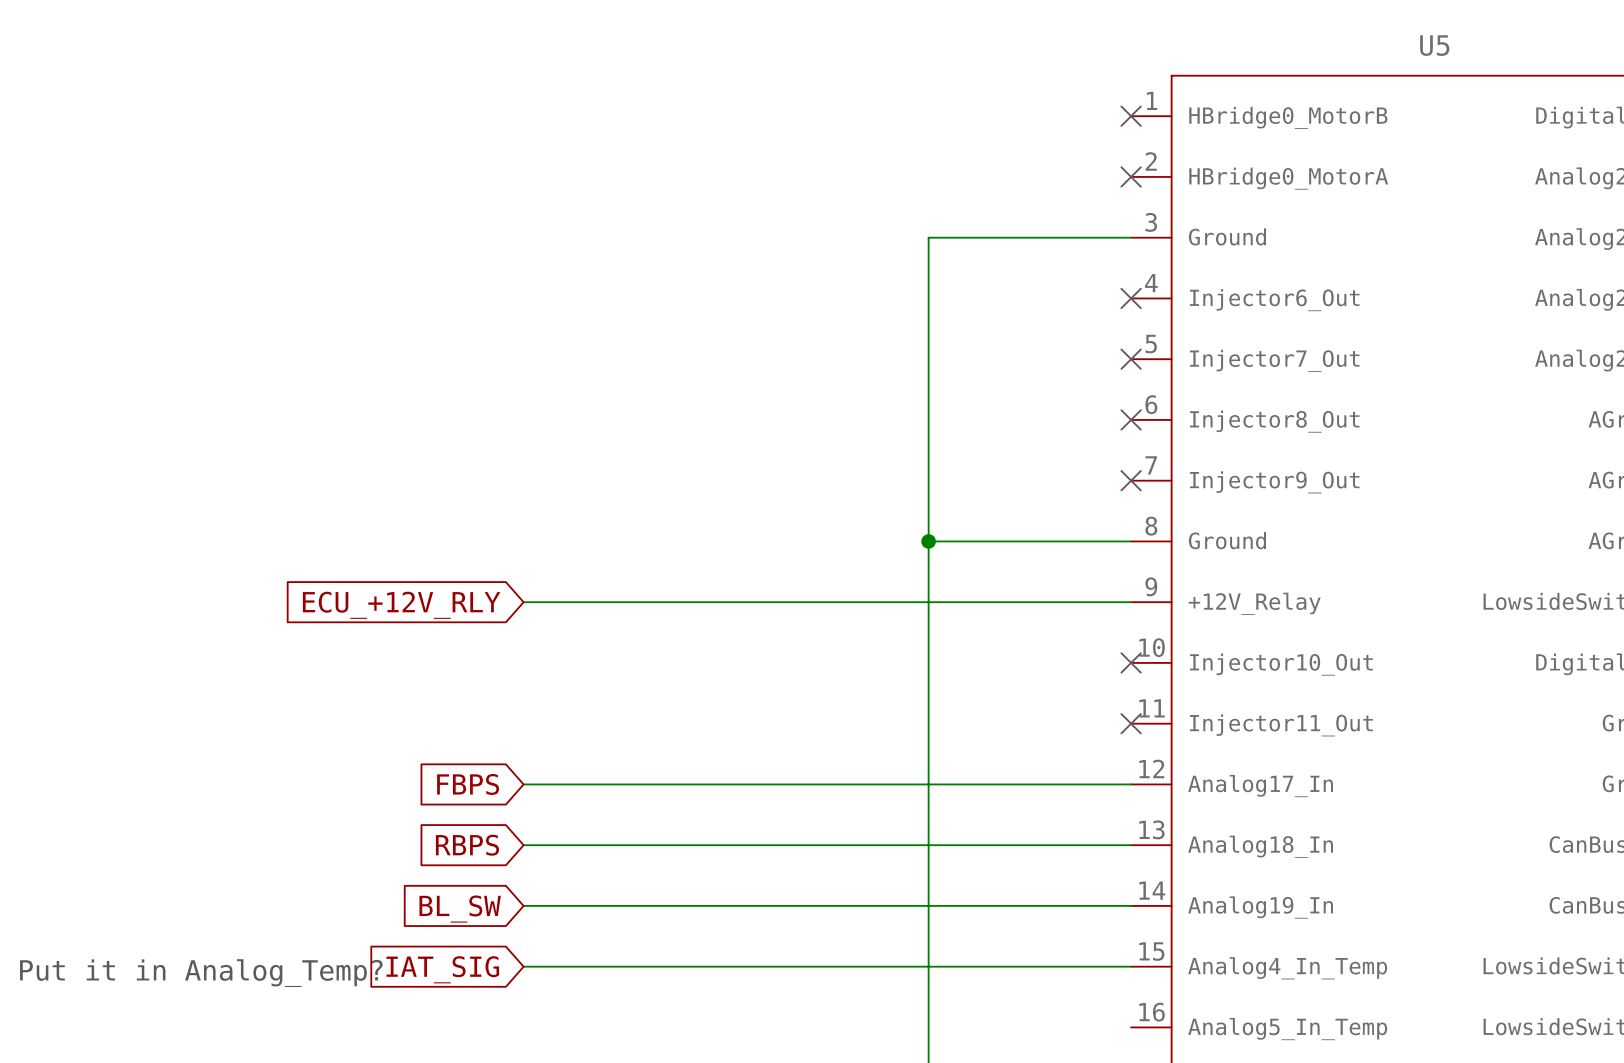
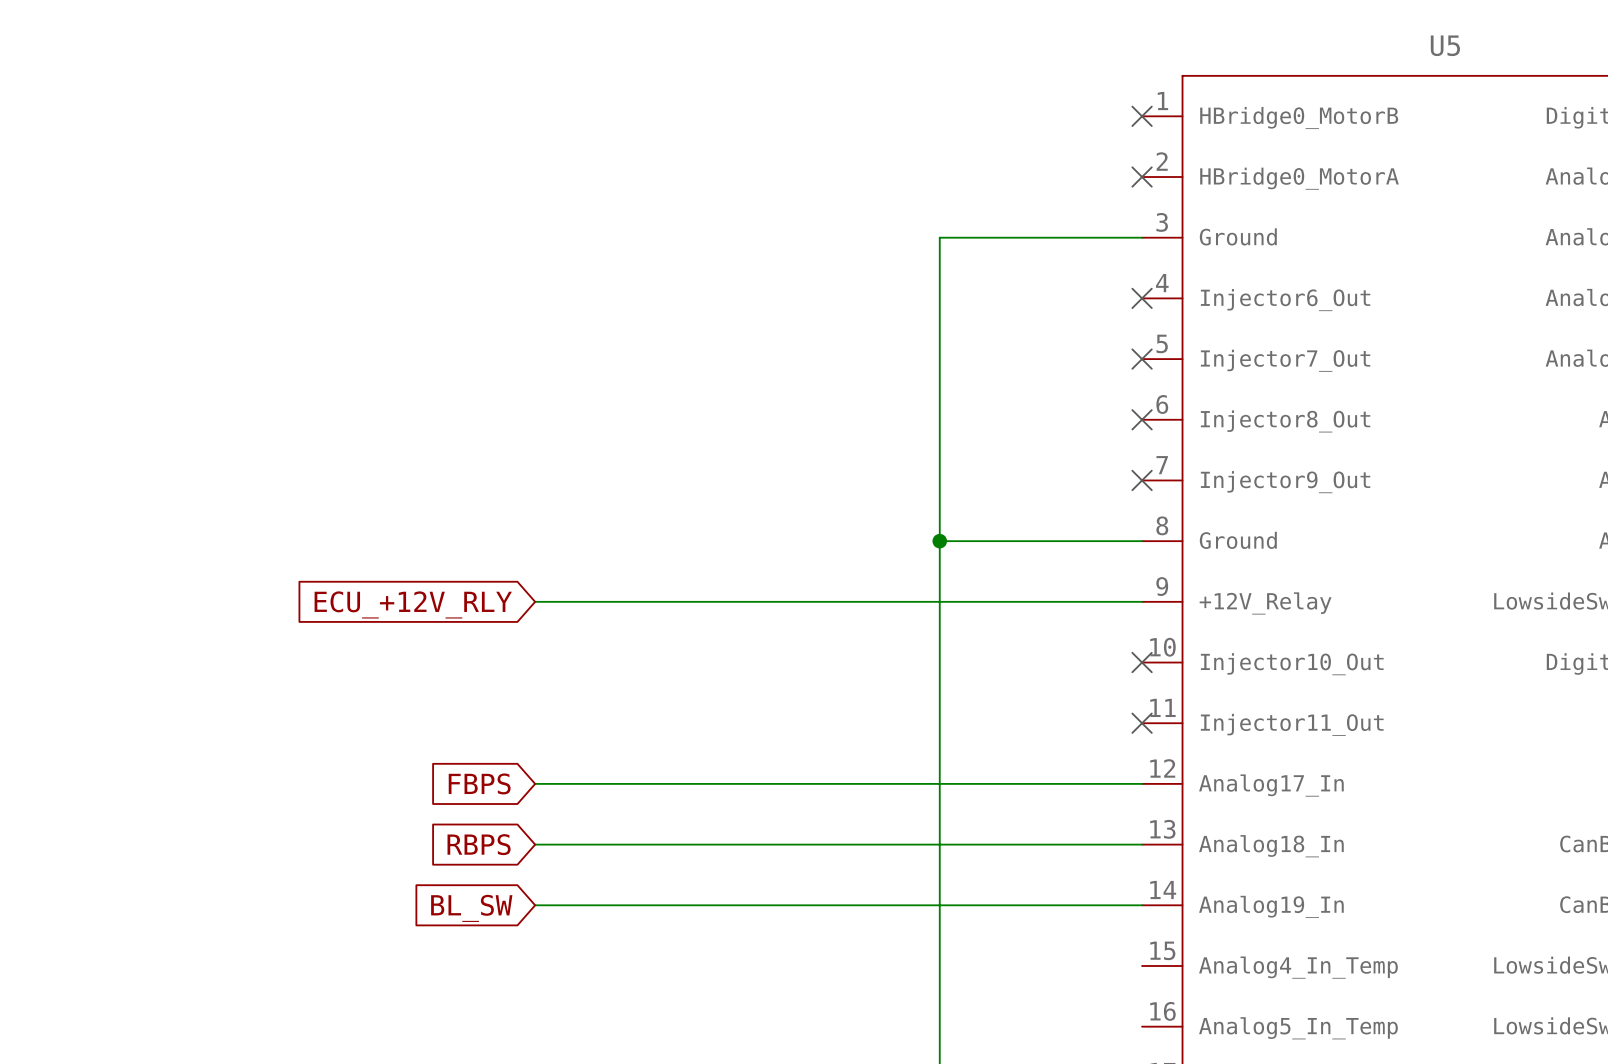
wire: (523, 966) (1131, 966) -> none
global label: IAT_SIG (442, 969) -> none
text: Put it in Analog_Temp? (201, 973) -> none

